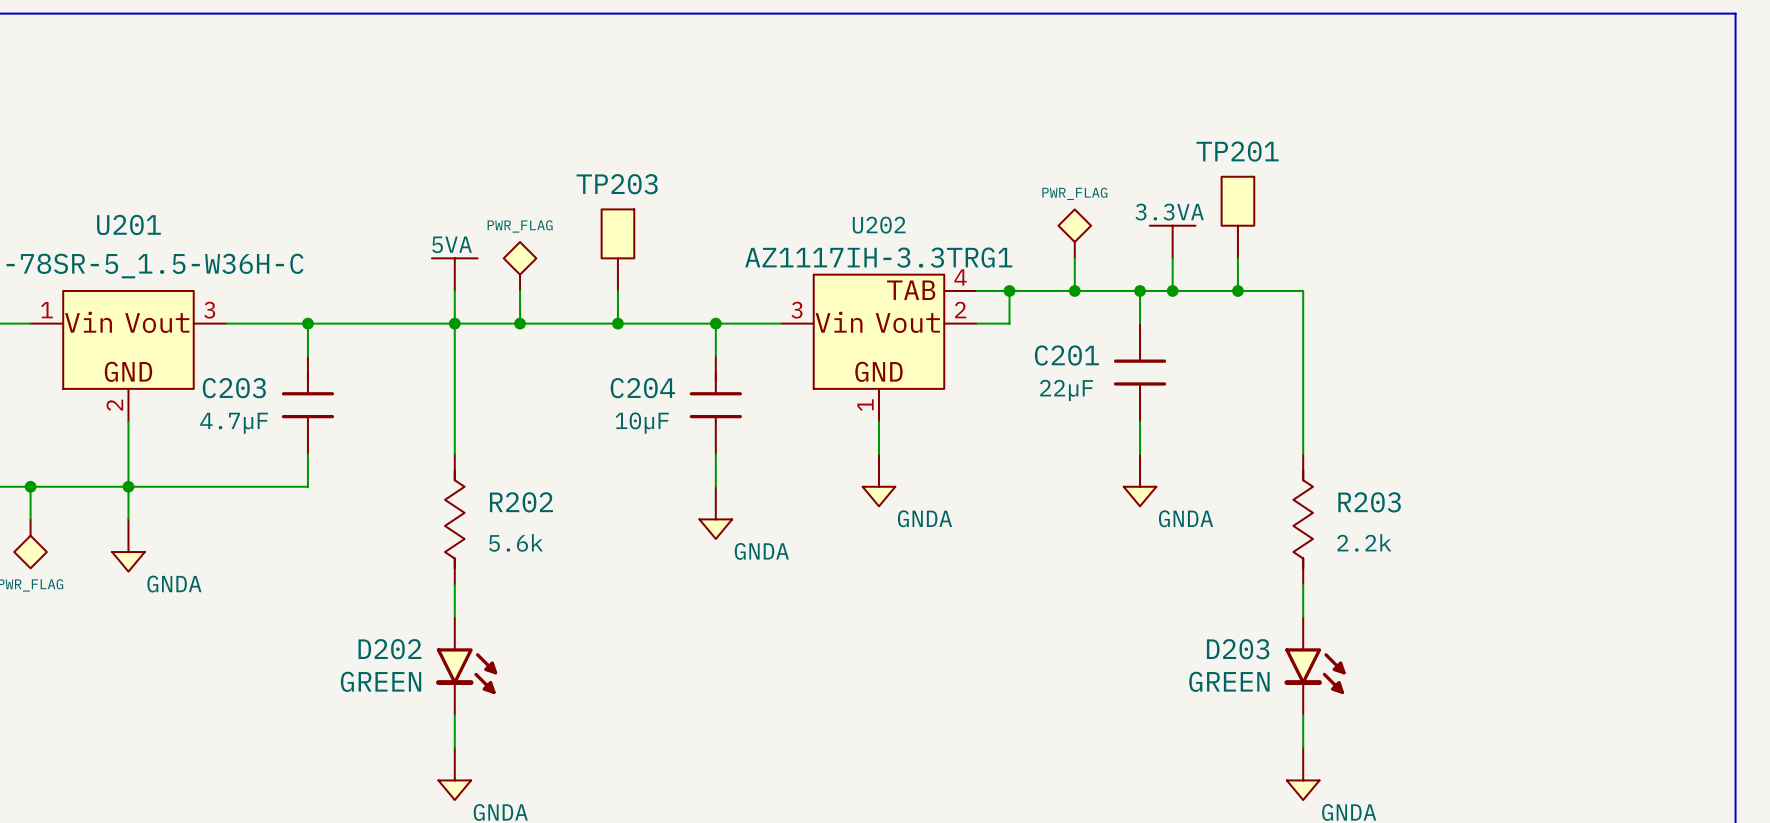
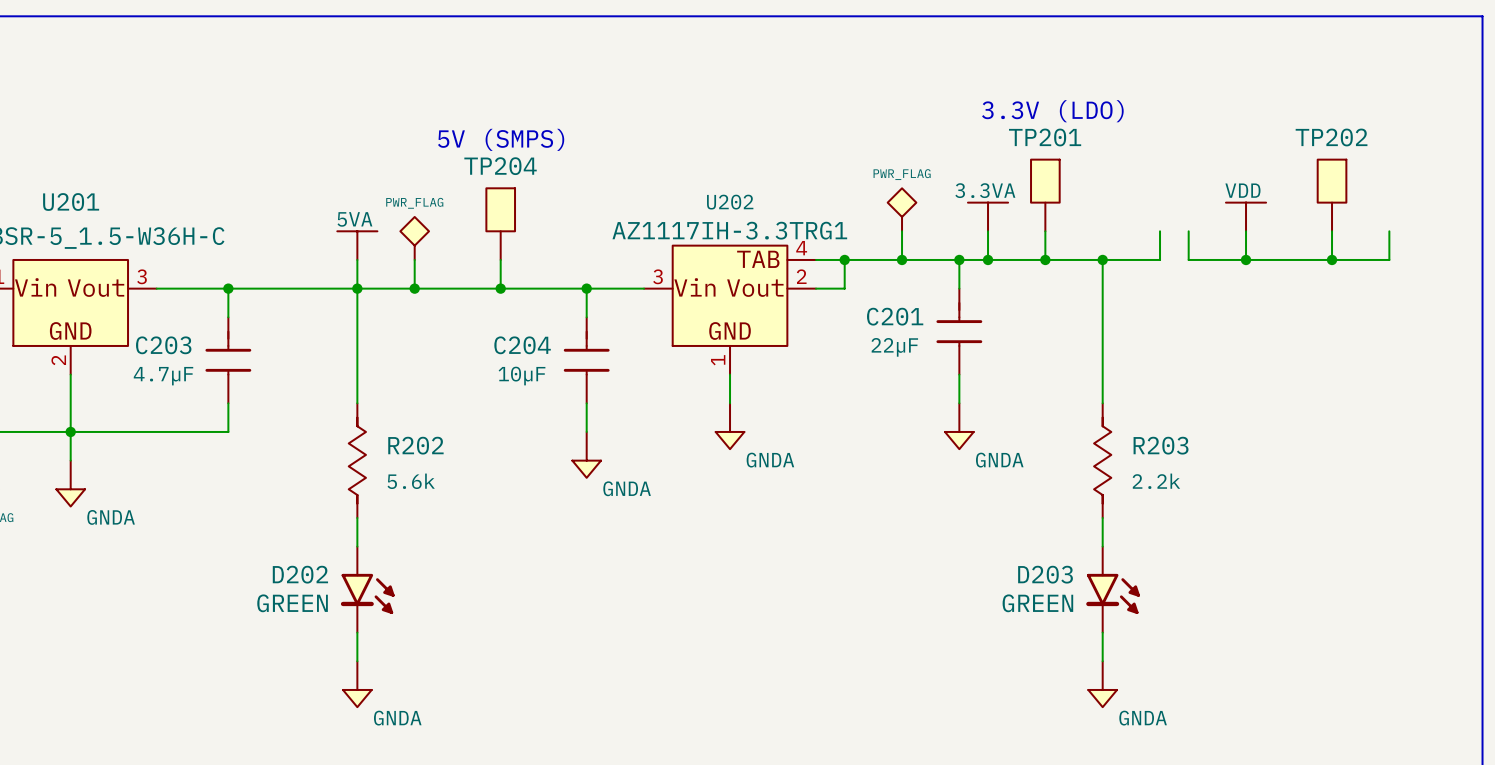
text: none -> 3.3V (LDO) (1052, 111)
text: none -> 5V (SMPS) (501, 139)
TP203 name: TP203 (617, 184) -> TP204 (500, 166)
TP202: none -> (1332, 195)
power symbol: none -> VDD (1246, 216)
wire: none -> (1160, 231) (1160, 259) (1102, 259)
wire: none -> (1188, 231) (1188, 259) (1389, 259) (1389, 231)
wire: none -> (1246, 231) (1246, 259)
wire: none -> (1332, 231) (1332, 259)
junction: none -> (1102, 259)
junction: none -> (1246, 259)
junction: none -> (1332, 259)

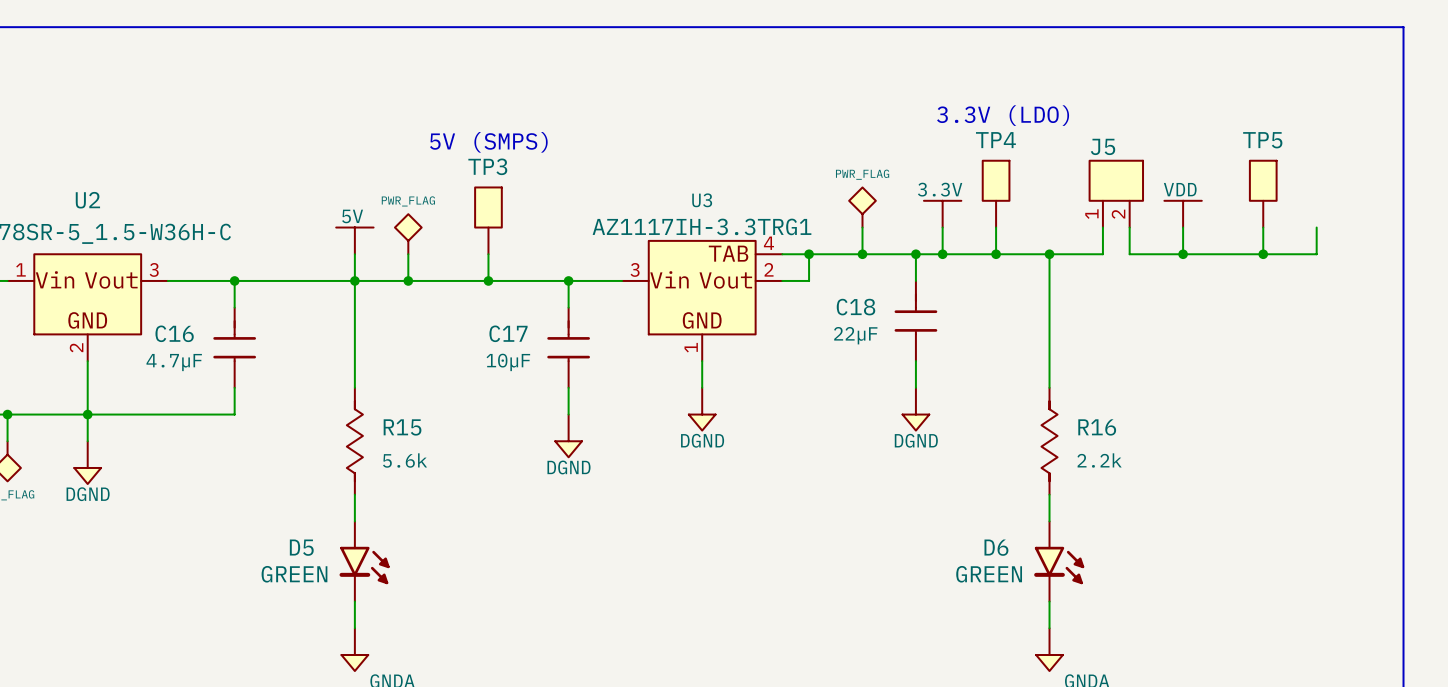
TP201 name: TP201 (1045, 137) -> TP4 (995, 140)
TP202 name: TP202 (1331, 137) -> TP5 (1262, 140)
TP204 name: TP204 (500, 166) -> TP3 (487, 166)
J5: none -> (1116, 194)
U201 name: U201 (71, 201) -> U2 (87, 200)
U202 name: U202 (730, 202) -> U3 (702, 200)
power symbol: 3.3VA (988, 216) -> 3.3V (942, 214)
power symbol: 5VA (357, 245) -> 5V (354, 240)
C201 name: C201 (895, 316) -> C18 (855, 307)
C203 name: C203 (163, 345) -> C16 (174, 333)
C204 name: C204 (522, 345) -> C17 (508, 333)
power symbol: GNDA (730, 426) -> DGND (702, 409)
power symbol: GNDA (959, 426) -> DGND (915, 409)
R202 name: R202 (415, 445) -> R15 (402, 427)
R203 name: R203 (1161, 445) -> R16 (1097, 427)
power symbol: GNDA (586, 454) -> DGND (568, 435)
power symbol: GNDA (70, 483) -> DGND (87, 462)
D202 name: D202 (300, 574) -> D5 (301, 547)
D203 name: D203 (1045, 574) -> D6 (996, 547)

